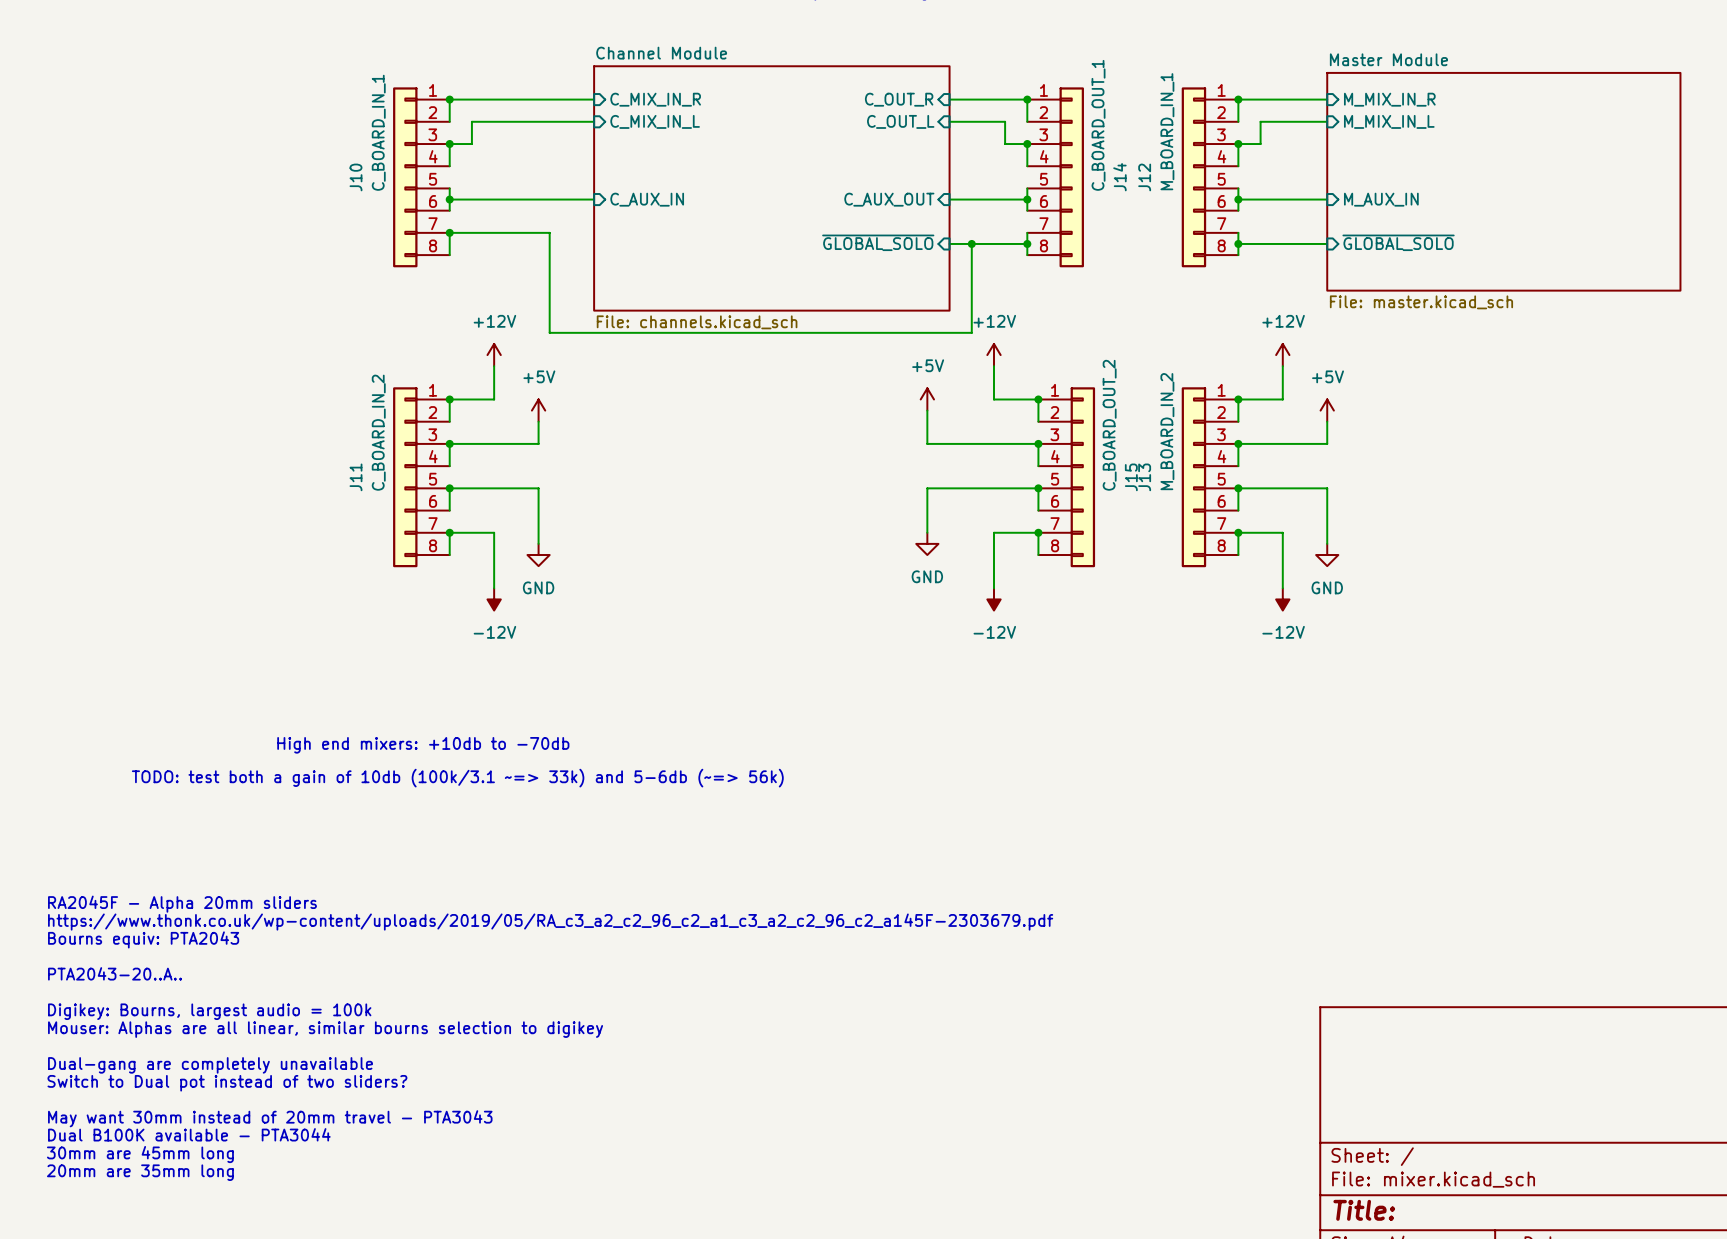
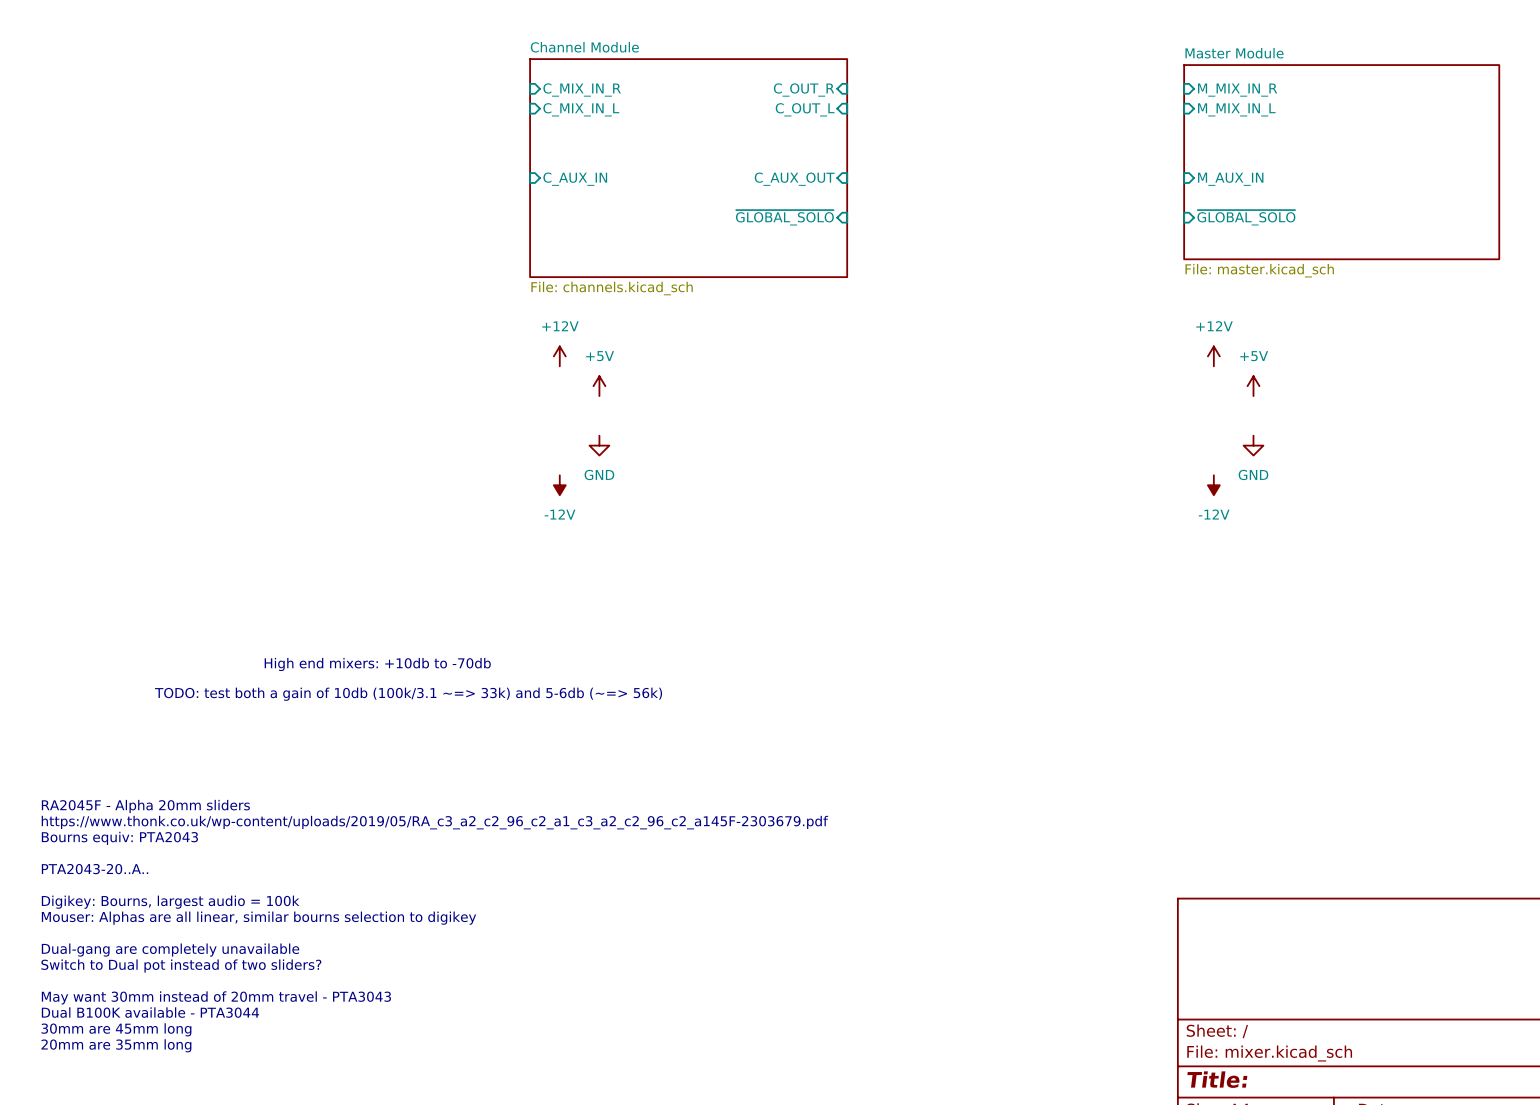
junction: (449, 99) -> none
wire: (594, 99) (449, 99) (449, 121) -> none
wire: (949, 99) (1027, 99) (1027, 121) -> none
junction: (1027, 99) -> none
junction: (1238, 99) -> none
wire: (1327, 99) (1238, 99) (1238, 121) -> none
wire: (594, 121) (471, 121) (471, 144) (449, 144) (449, 166) -> none
wire: (949, 121) (1005, 121) (1005, 144) (1027, 144) (1027, 166) -> none
wire: (1327, 121) (1260, 121) (1260, 144) (1238, 144) (1238, 166) -> none
junction: (449, 144) -> none
junction: (1027, 144) -> none
junction: (1238, 144) -> none
J10: C_BOARD_IN_1 (421, 177) -> none
J14: C_BOARD_OUT_1 (1055, 177) -> none
J12: M_BOARD_IN_1 (1210, 177) -> none
wire: (449, 188) (449, 210) -> none
wire: (1027, 188) (1027, 210) -> none
wire: (1238, 188) (1238, 210) -> none
wire: (449, 199) (594, 199) -> none
junction: (449, 199) -> none
wire: (949, 199) (1027, 199) -> none
junction: (1027, 199) -> none
wire: (1238, 199) (1327, 199) -> none
junction: (1238, 199) -> none
junction: (449, 232) -> none
wire: (1027, 232) (1027, 255) -> none
wire: (1238, 232) (1238, 255) -> none
wire: (949, 243) (1027, 243) -> none
wire: (971, 243) (971, 332) (549, 332) (549, 232) (449, 232) (449, 255) -> none
junction: (971, 243) -> none
junction: (1027, 243) -> none
wire: (1238, 243) (1327, 243) -> none
junction: (1238, 243) -> none
power symbol position: +12V (494, 355) -> +12V (559, 356)
power symbol: +12V (994, 355) -> none
power symbol position: +12V (1282, 355) -> +12V (1213, 356)
wire: (494, 366) (494, 399) (449, 399) (449, 421) -> none
wire: (994, 366) (994, 399) (1038, 399) (1038, 421) -> none
wire: (1282, 366) (1282, 399) (1238, 399) (1238, 421) -> none
junction: (449, 399) -> none
power symbol: +5V (927, 399) -> none
junction: (1038, 399) -> none
junction: (1238, 399) -> none
power symbol: +5V (538, 410) -> none
wire: (927, 410) (927, 443) (1038, 443) (1038, 466) -> none
power symbol position: +5V (1327, 410) -> +5V (1253, 386)
wire: (538, 421) (538, 443) (449, 443) (449, 466) -> none
wire: (1327, 421) (1327, 443) (1238, 443) (1238, 466) -> none
power symbol: none -> +5V (599, 386)
junction: (449, 443) -> none
junction: (1038, 443) -> none
junction: (1238, 443) -> none
J11: C_BOARD_IN_2 (421, 477) -> none
J15: C_BOARD_OUT_2 (1066, 477) -> none
J13: M_BOARD_IN_2 (1210, 477) -> none
junction: (449, 488) -> none
junction: (1038, 488) -> none
junction: (1238, 488) -> none
power symbol: none -> GND (599, 445)
wire: (449, 510) (449, 488) (538, 488) (538, 543) -> none
wire: (1038, 510) (1038, 488) (927, 488) (927, 532) -> none
wire: (1238, 510) (1238, 488) (1327, 488) (1327, 543) -> none
junction: (449, 532) -> none
junction: (1038, 532) -> none
junction: (1238, 532) -> none
power symbol: GND (927, 543) -> none
wire: (449, 555) (449, 532) (494, 532) (494, 588) -> none
power symbol: GND (538, 555) -> none
wire: (1038, 555) (1038, 532) (994, 532) (994, 588) -> none
wire: (1238, 555) (1238, 532) (1282, 532) (1282, 588) -> none
power symbol position: GND (1327, 555) -> GND (1253, 445)
power symbol position: -12V (494, 599) -> -12V (559, 485)
power symbol: -12V (994, 599) -> none
power symbol position: -12V (1282, 599) -> -12V (1213, 485)

